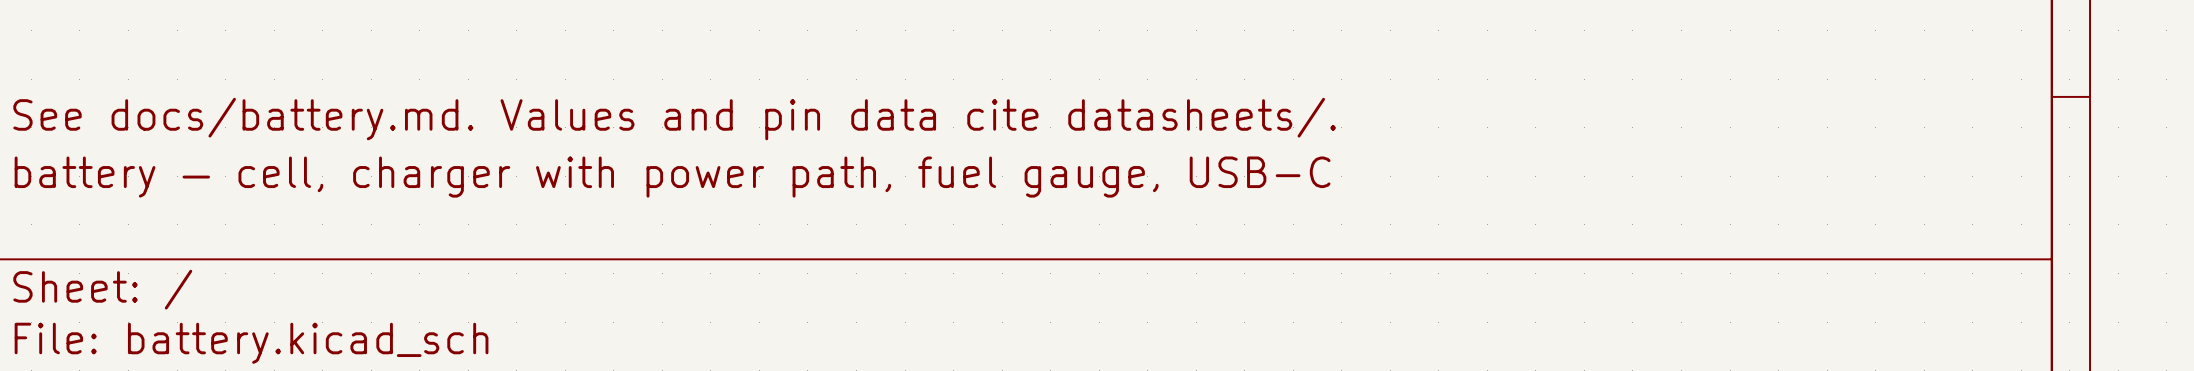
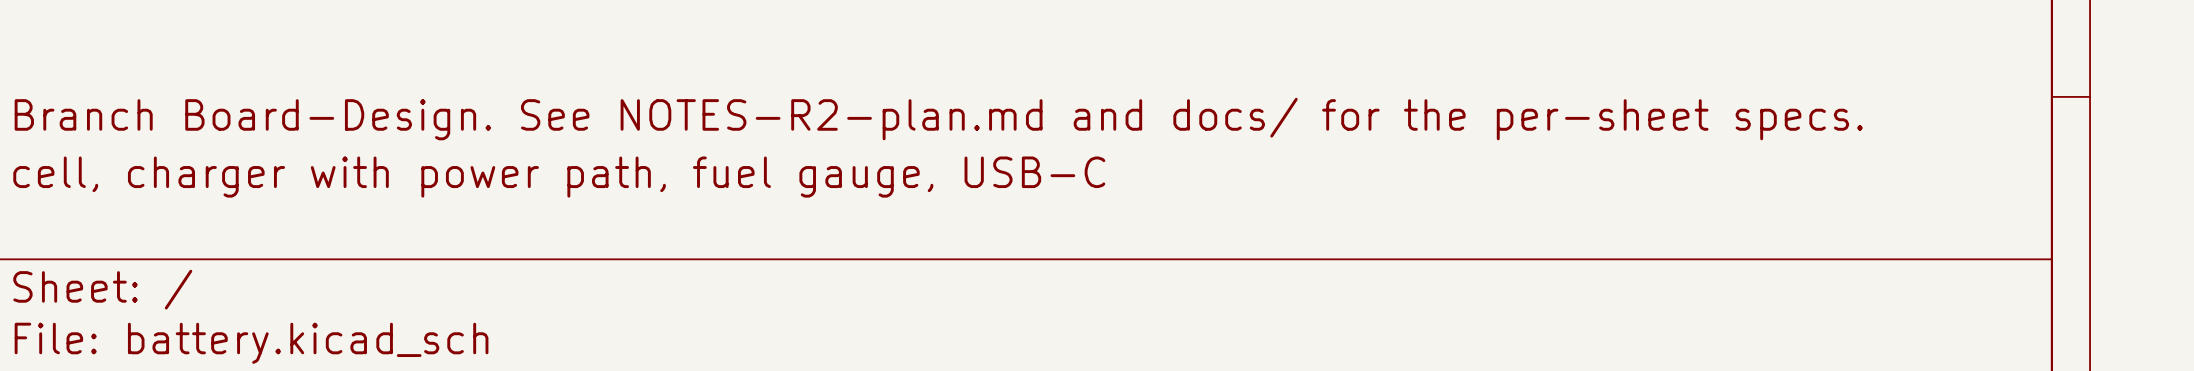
title block: See docs/battery.md. Values and pin data cite datasheets/. (674, 119) -> Branch Board-Design. See NOTES-R2-plan.md and docs/ for the per-sheet specs. (938, 119)
title block: battery — cell, charger with power path, fuel gauge, USB-C (672, 177) -> cell, charger with power path, fuel gauge, USB-C (559, 177)

